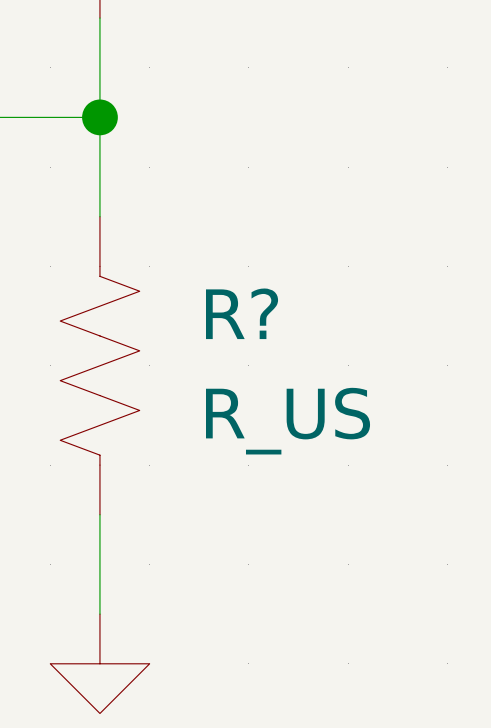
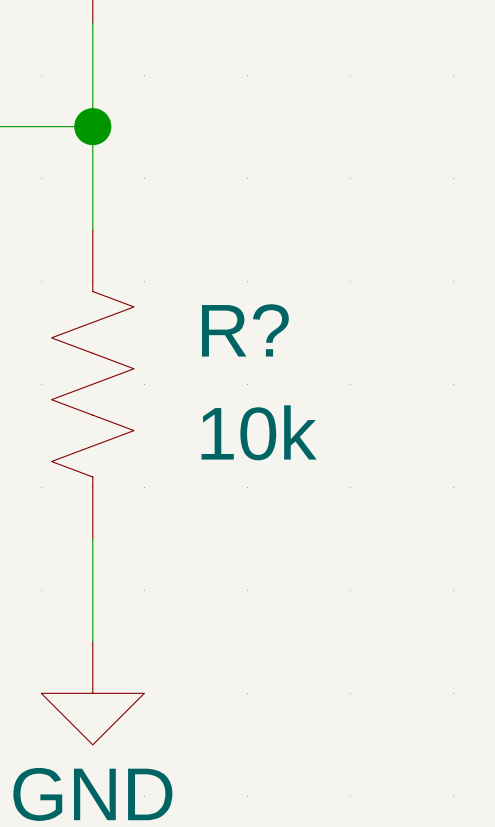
R? value: R_US (288, 421) -> 10k (259, 432)

